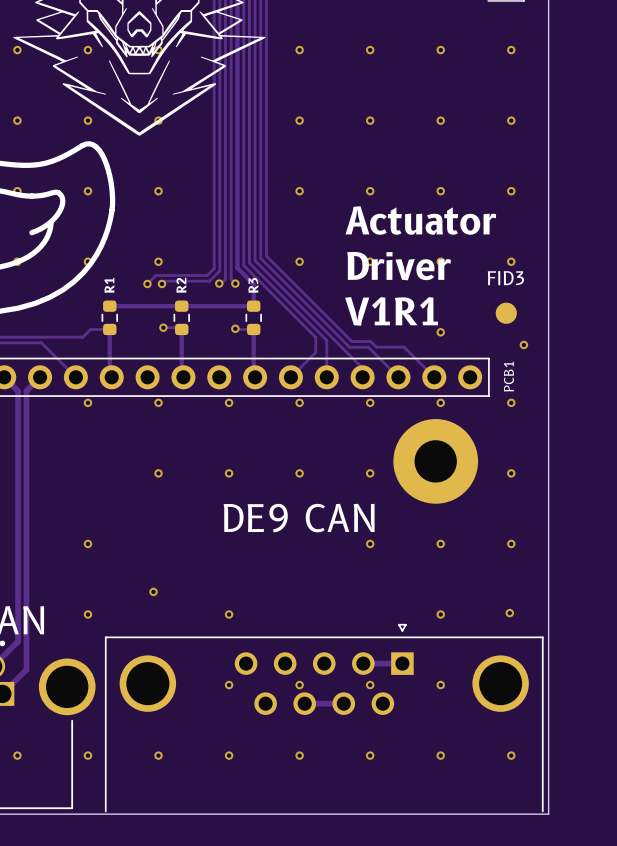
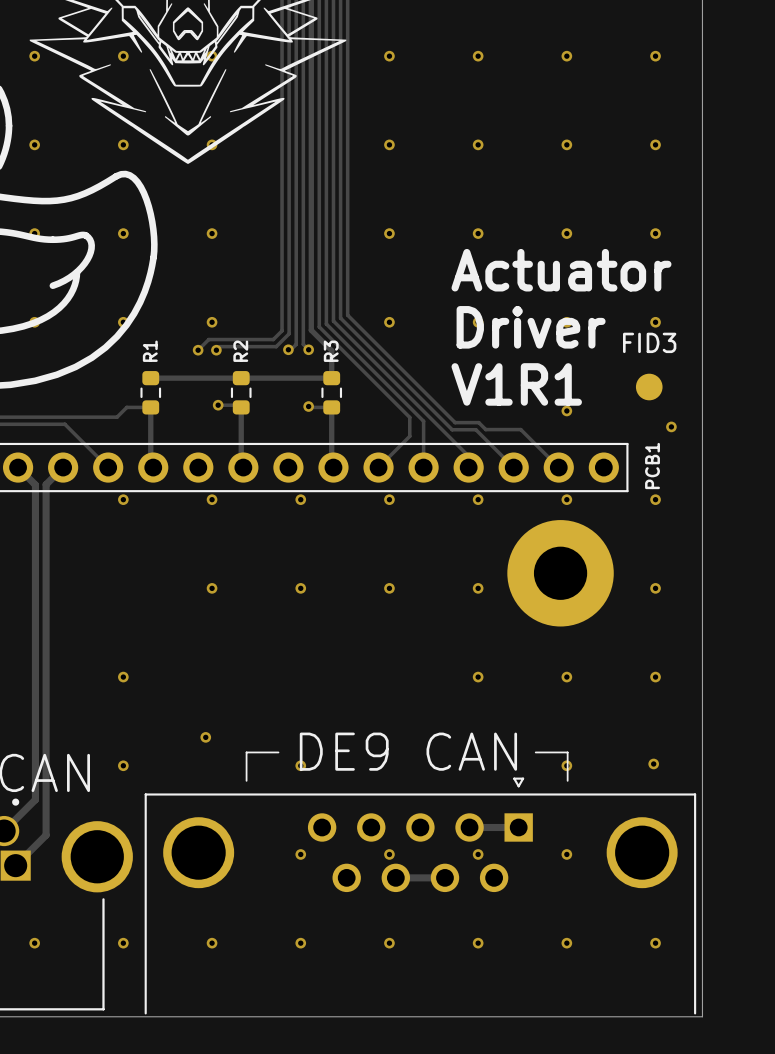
text position: DE9 CAN (299, 518) -> DE9 CAN (408, 751)
line: none -> (278, 752) (246, 752) (246, 780)
line: none -> (535, 752) (567, 752) (567, 780)

